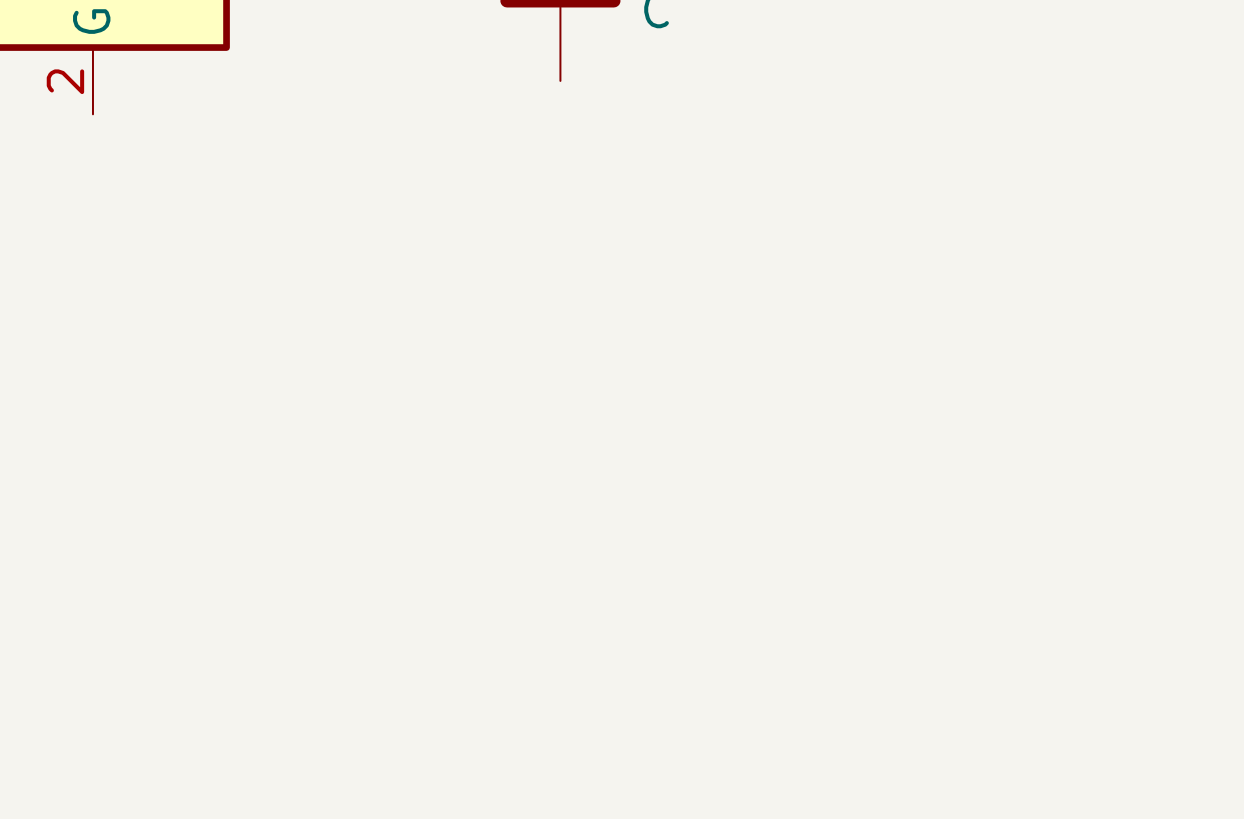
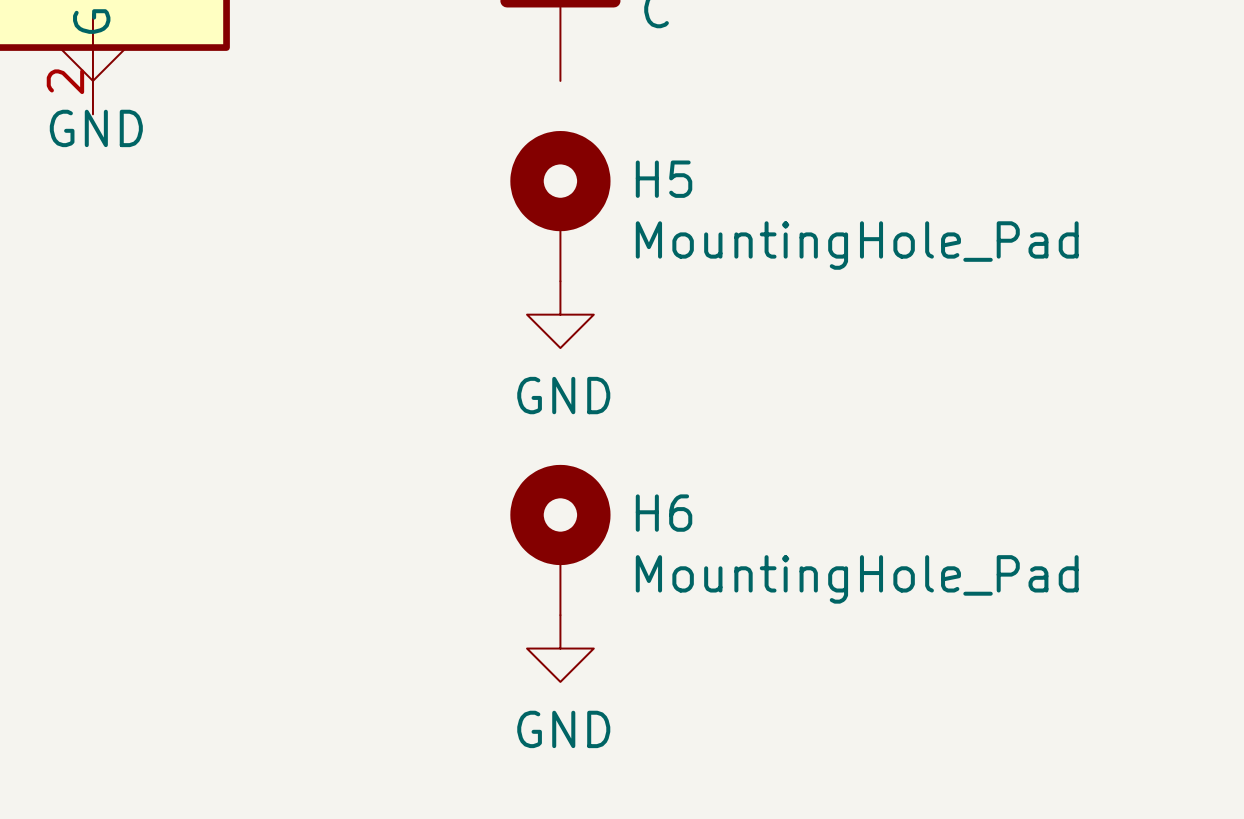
power symbol: none -> GND (92, 47)
H5: none -> MountingHole_Pad (560, 206)
power symbol: none -> GND (560, 314)
H6: none -> MountingHole_Pad (560, 540)
power symbol: none -> GND (560, 648)

